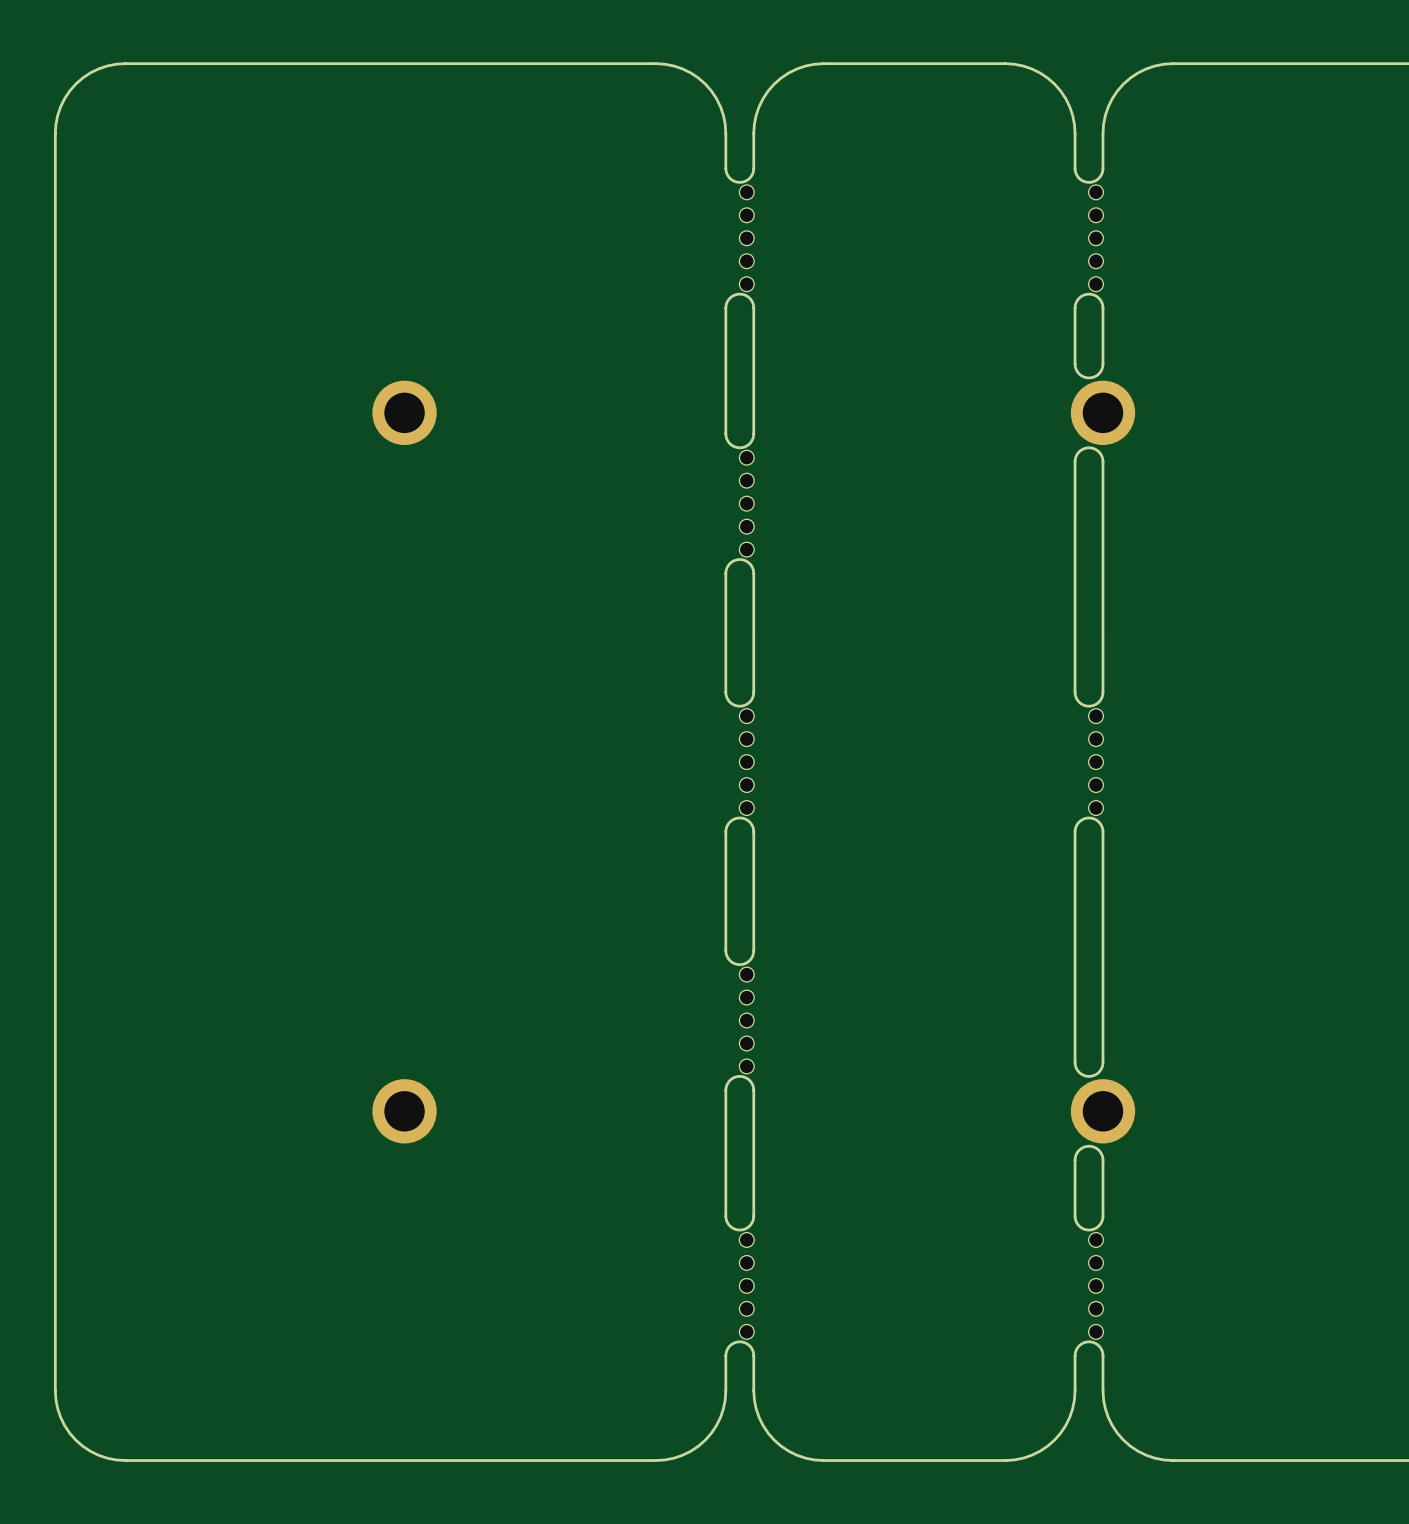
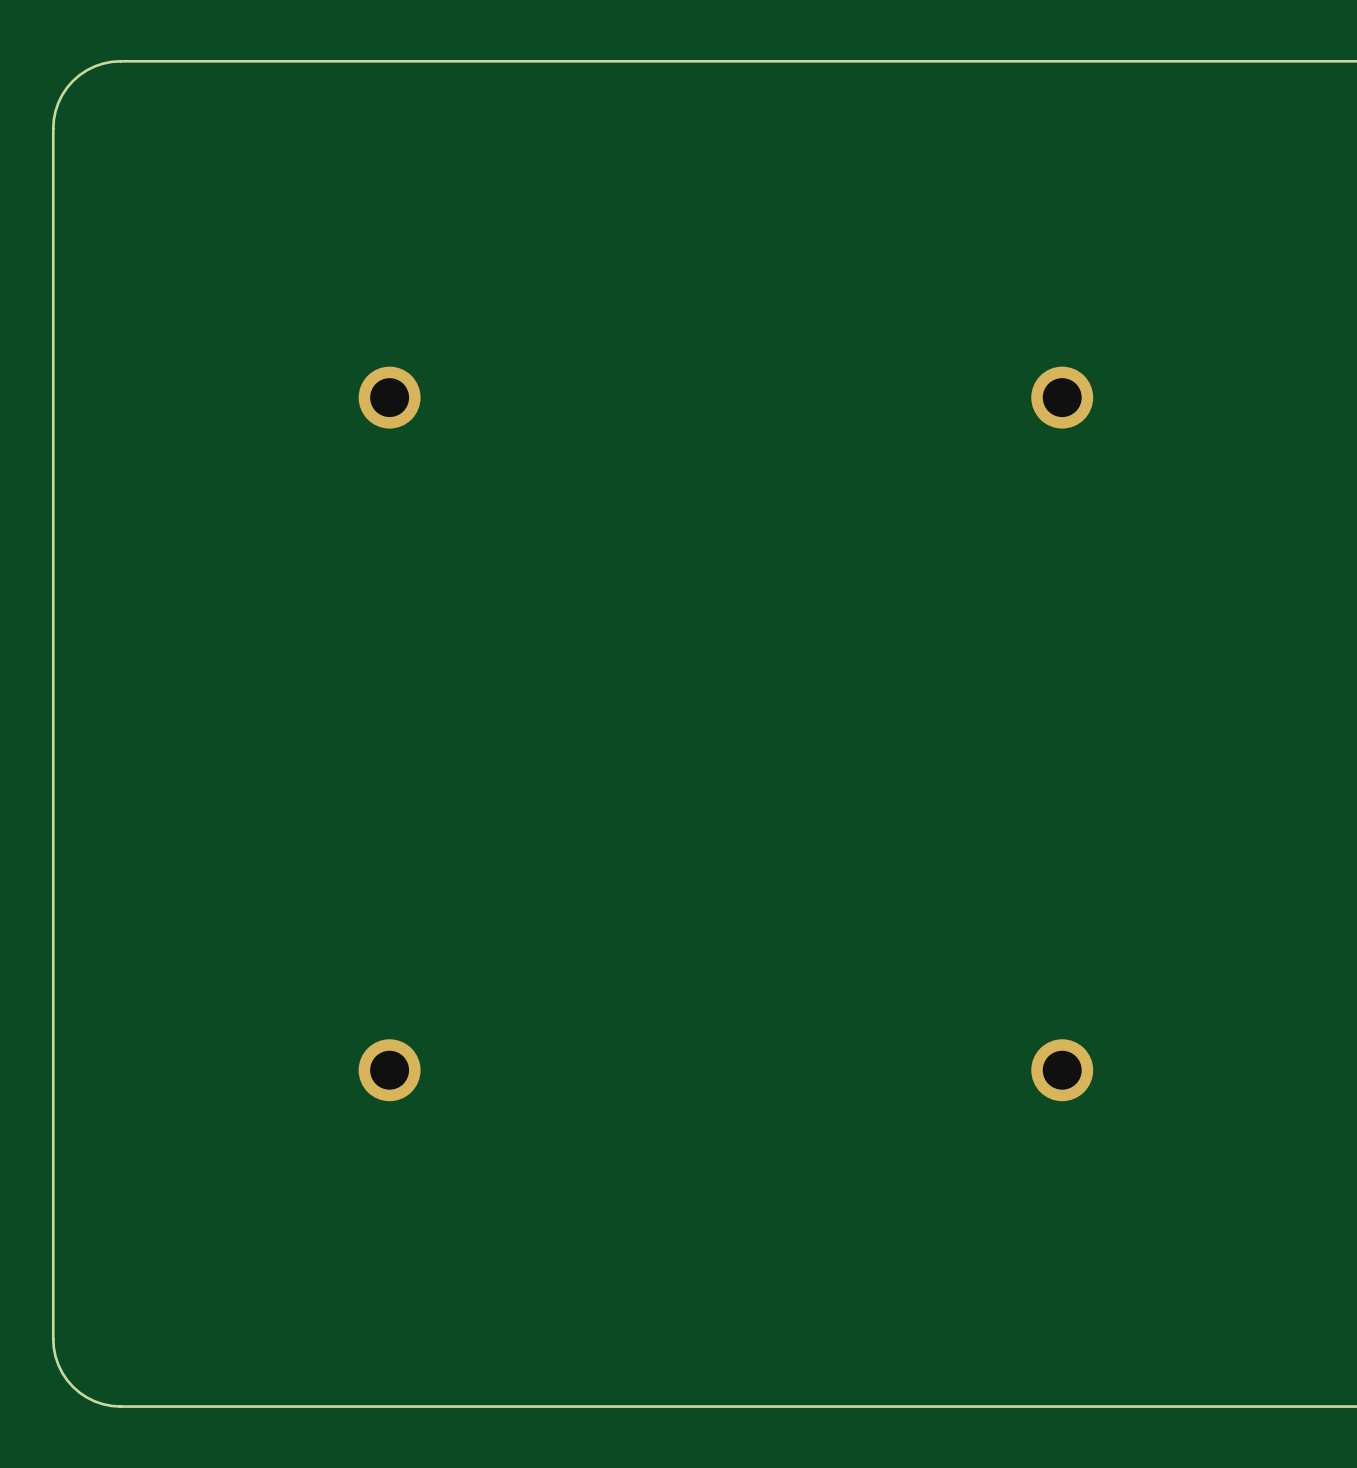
board edge: (655, 63) (674, 66) (690, 72) (711, 90) (720, 106) (725, 124) (726, 172) (731, 179) (739, 182) (748, 179) (753, 172) (754, 124) (759, 106) (768, 90) (781, 78) (796, 68) (823, 63) -> (631, 61) (793, 61)
board edge: (1005, 63) (1023, 66) (1040, 72) (1060, 90) (1069, 106) (1074, 124) (1075, 172) (1080, 179) (1089, 182) (1097, 179) (1102, 172) (1103, 124) (1108, 106) (1117, 90) (1130, 78) (1146, 68) (1172, 63) -> (968, 61) (1129, 61)
part: (746, 238) -> none
part: (1096, 238) -> none
board edge: (725, 308) (725, 435) (731, 444) (741, 447) (749, 443) (753, 435) (753, 306) (748, 297) (737, 294) (729, 298) (725, 308) -> none
board edge: (1075, 308) (1075, 367) (1082, 376) (1092, 377) (1098, 373) (1102, 365) (1102, 304) (1097, 297) (1087, 294) (1079, 298) (1075, 308) -> none
board edge: (1075, 461) (1075, 692) (1079, 702) (1089, 706) (1098, 702) (1102, 692) (1102, 461) (1098, 451) (1089, 447) (1079, 451) (1076, 456) (1075, 461) -> none
part: (746, 503) -> none
board edge: (725, 573) (725, 694) (731, 703) (741, 706) (749, 702) (753, 694) (753, 571) (749, 563) (739, 559) (729, 563) (725, 573) -> none
part: (746, 762) -> none
part: (1096, 762) -> none
board edge: (725, 831) (725, 952) (731, 961) (741, 964) (749, 960) (753, 952) (753, 830) (749, 822) (739, 817) (729, 822) (725, 831) -> none
board edge: (1075, 831) (1075, 1062) (1079, 1072) (1089, 1076) (1098, 1072) (1102, 1062) (1102, 831) (1098, 822) (1089, 817) (1079, 822) (1075, 831) -> none
part: (746, 1020) -> none
board edge: (725, 1090) (725, 1217) (731, 1227) (741, 1229) (749, 1225) (753, 1217) (753, 1088) (749, 1080) (739, 1076) (729, 1080) (725, 1090) -> none
board edge: (1075, 1160) (1075, 1219) (1082, 1228) (1092, 1229) (1098, 1225) (1102, 1217) (1102, 1156) (1097, 1149) (1087, 1146) (1079, 1150) (1076, 1154) (1075, 1160) -> none
part: (746, 1285) -> none
part: (1096, 1285) -> none
board edge: (655, 1460) (682, 1455) (698, 1446) (711, 1433) (720, 1417) (725, 1399) (726, 1352) (731, 1344) (739, 1341) (748, 1344) (753, 1352) (754, 1399) (759, 1417) (768, 1433) (781, 1446) (796, 1455) (823, 1460) -> (631, 1406) (793, 1406)
board edge: (1005, 1460) (1031, 1455) (1047, 1446) (1060, 1433) (1069, 1417) (1074, 1399) (1075, 1352) (1080, 1344) (1089, 1341) (1097, 1344) (1102, 1352) (1103, 1399) (1108, 1417) (1117, 1433) (1130, 1446) (1146, 1455) (1172, 1460) -> (968, 1406) (1129, 1406)

